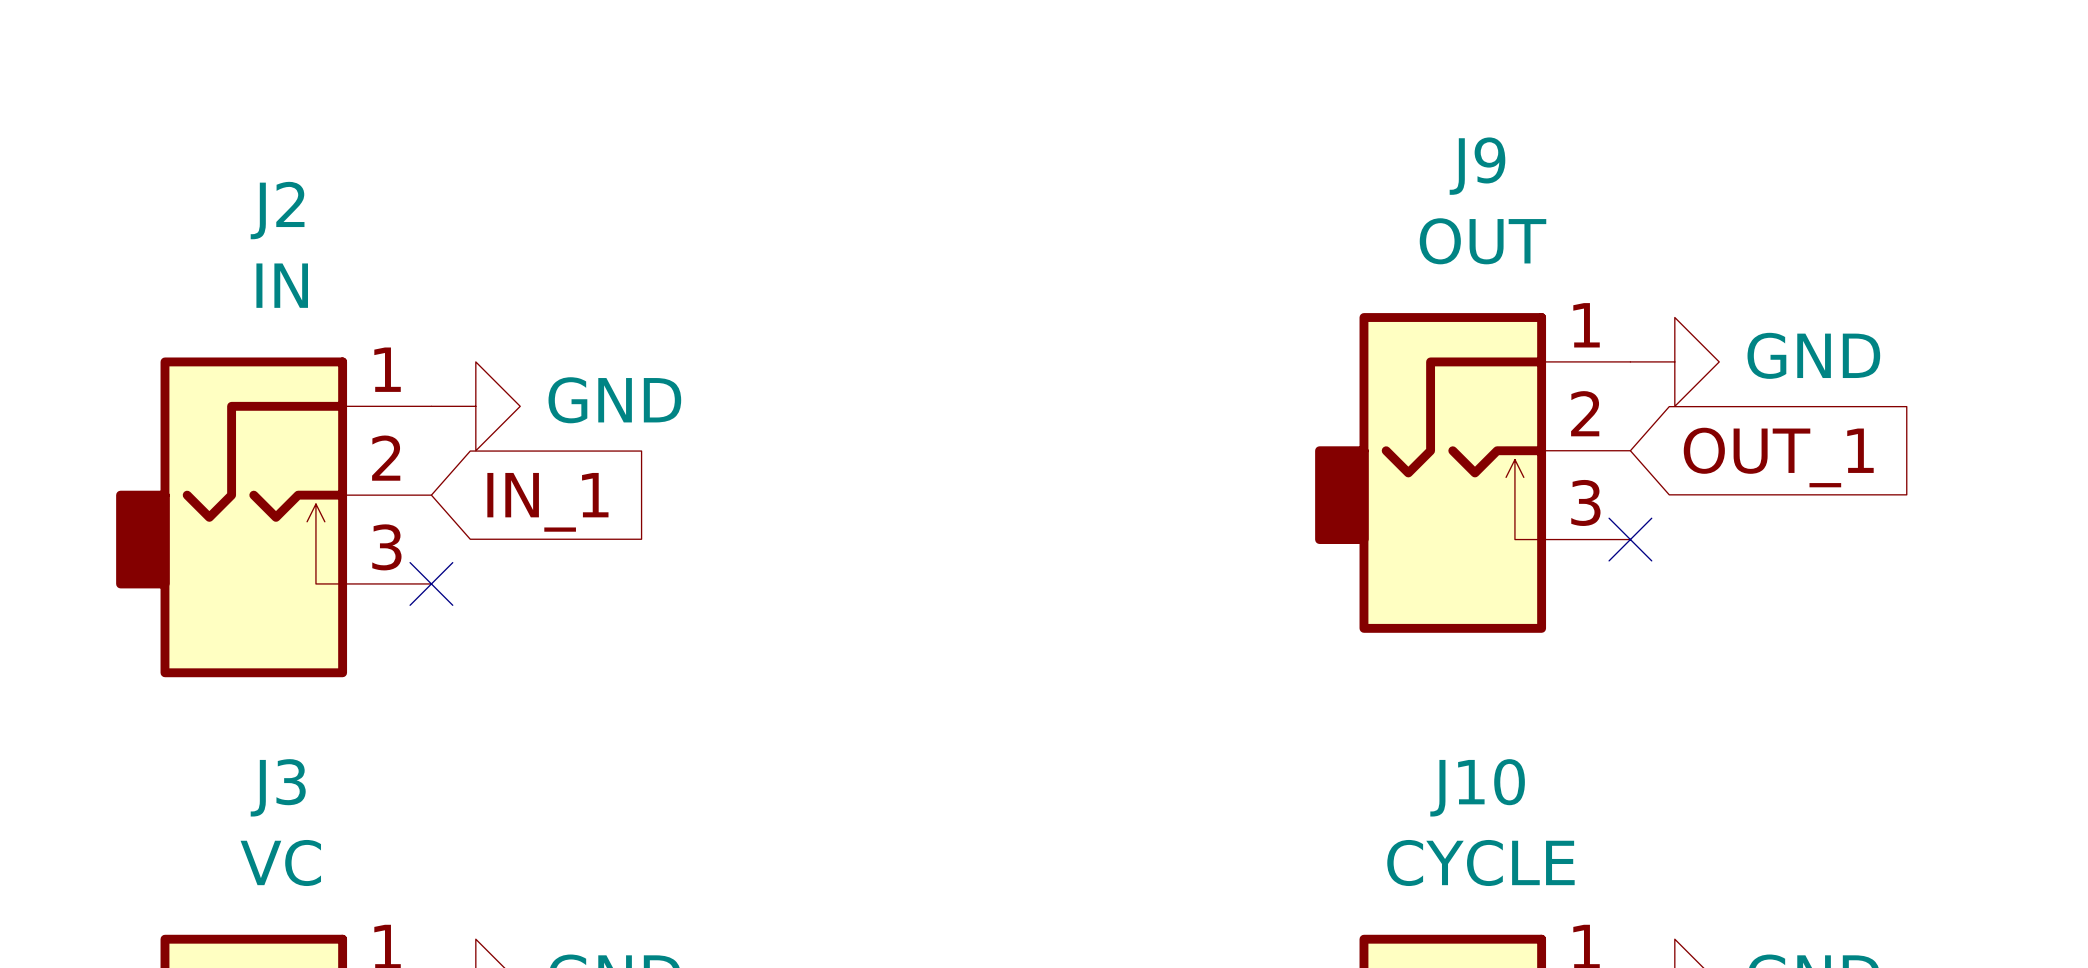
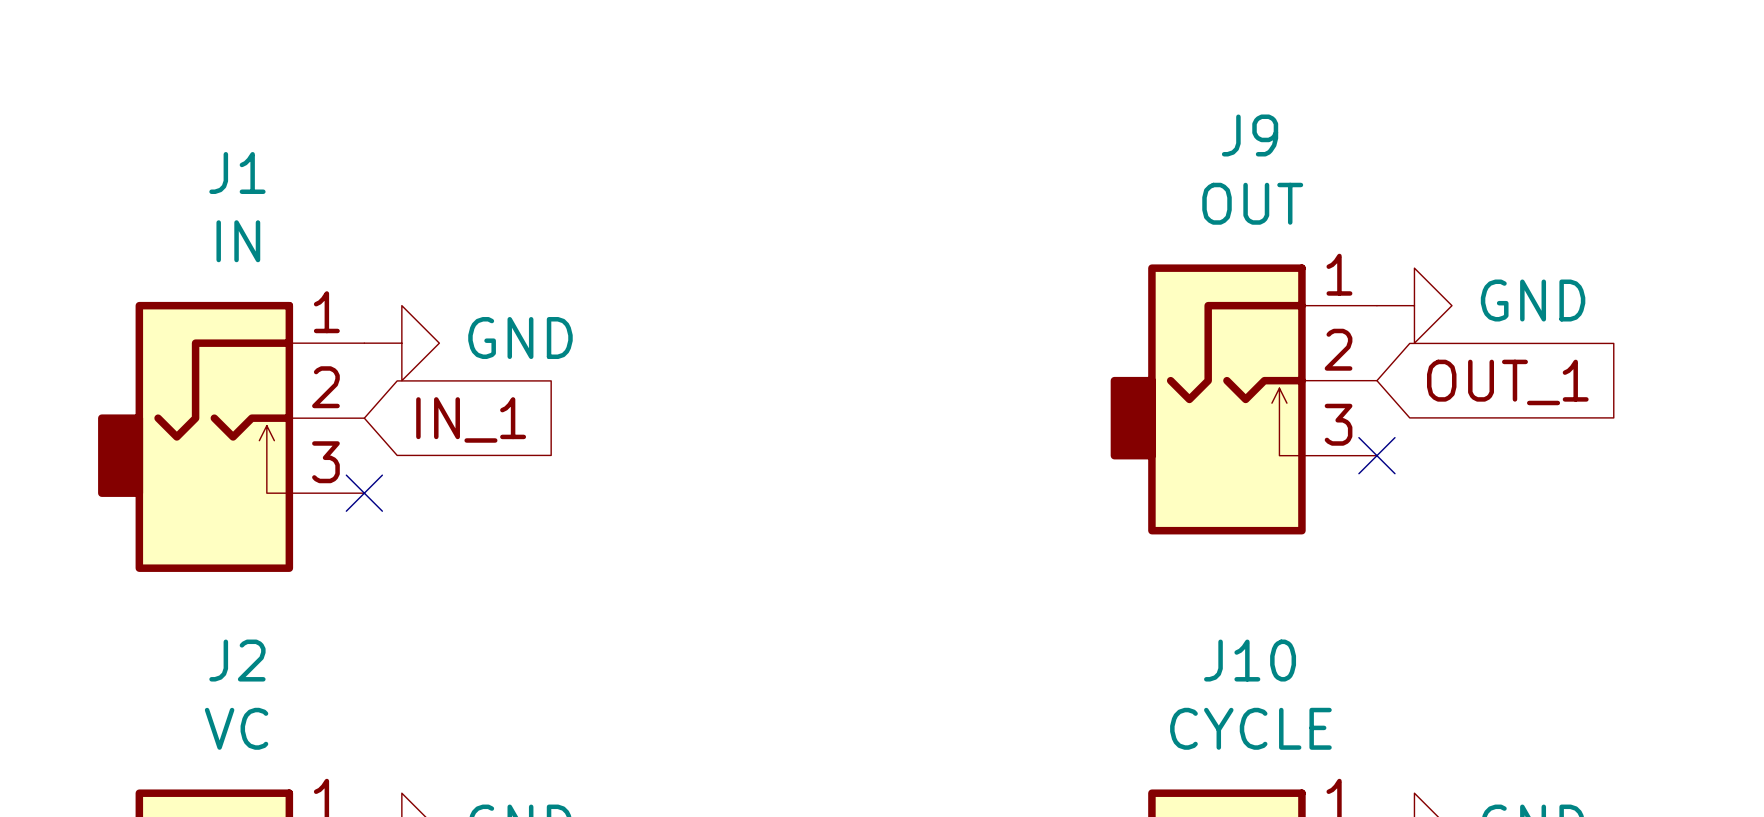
J2 name: J2 (277, 210) -> J1 (237, 172)
J3 name: J3 (278, 787) -> J2 (237, 660)

